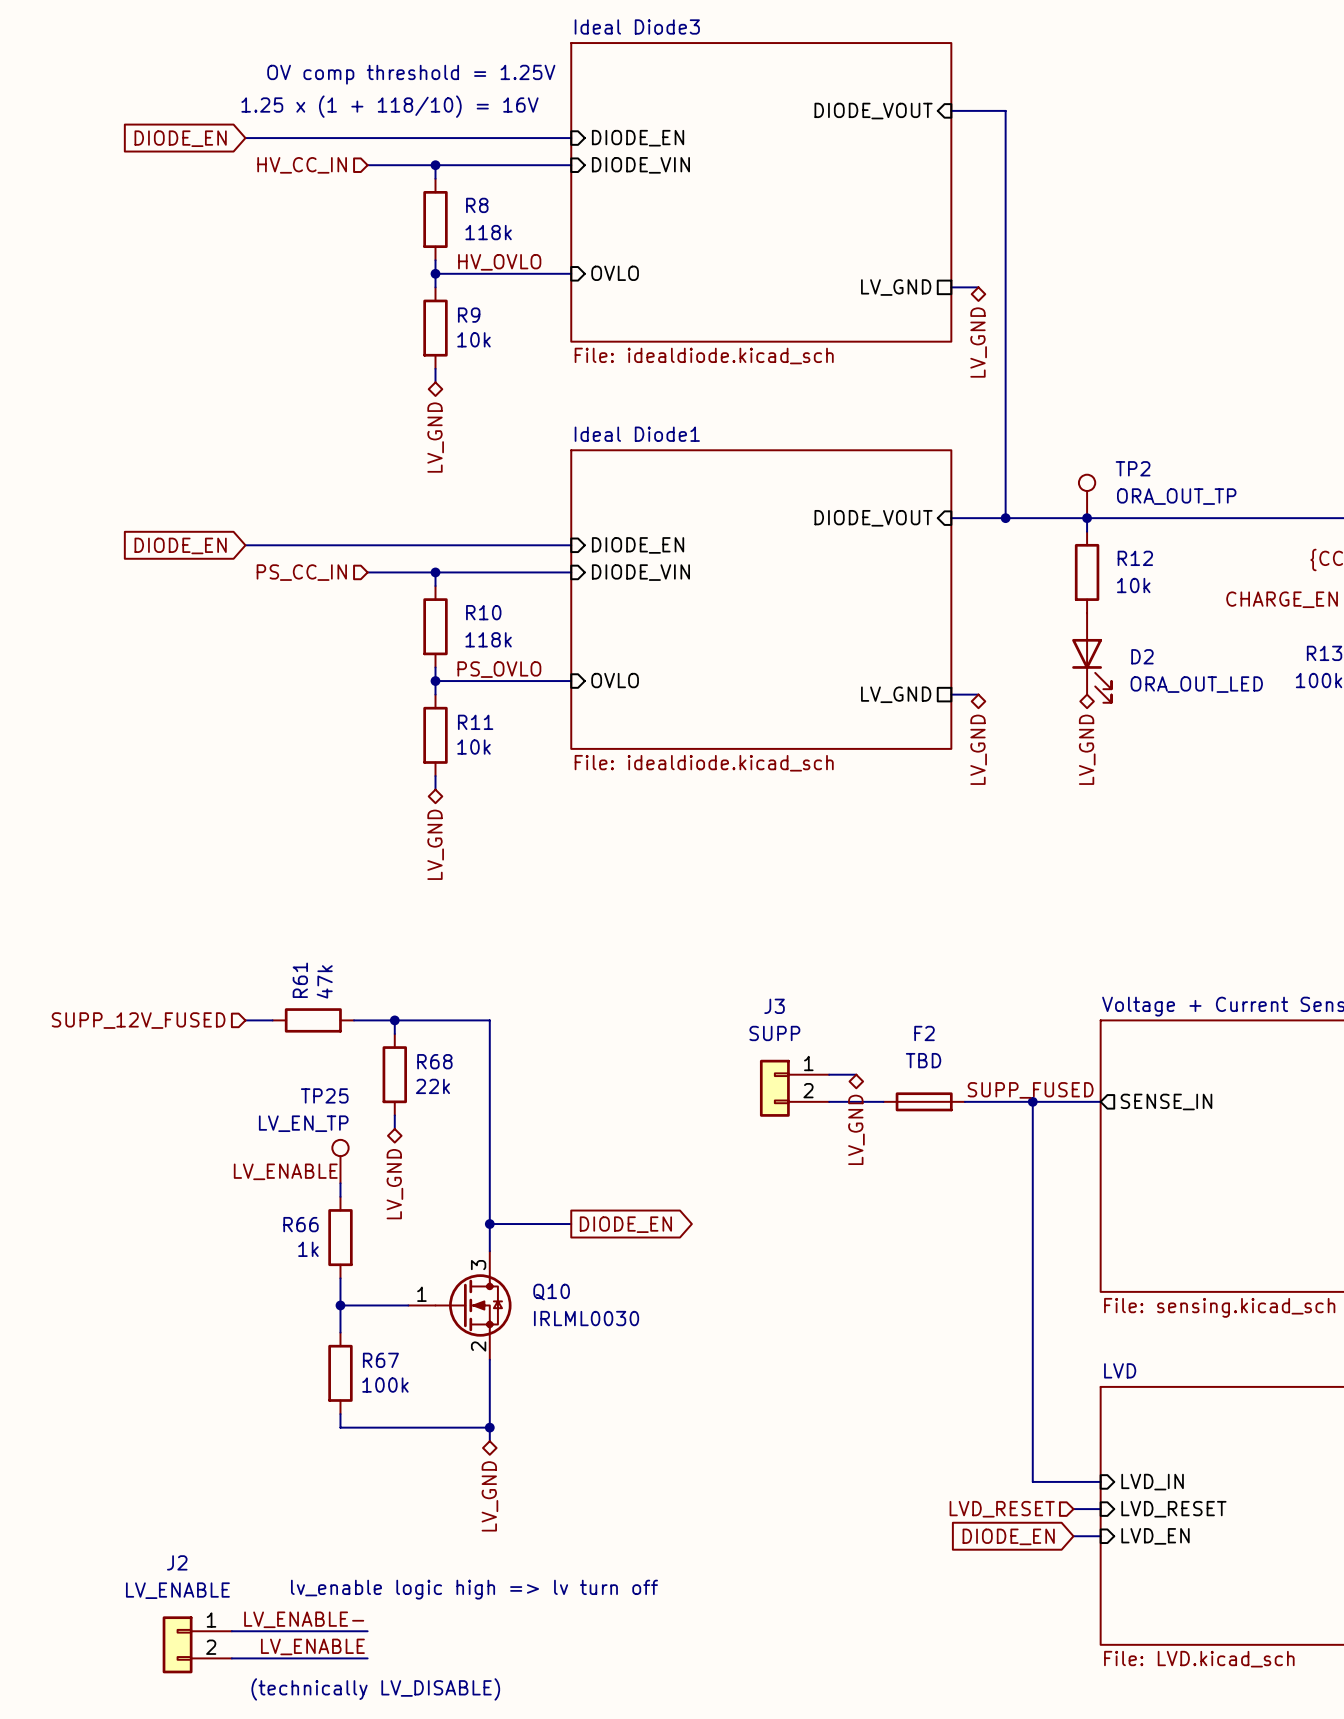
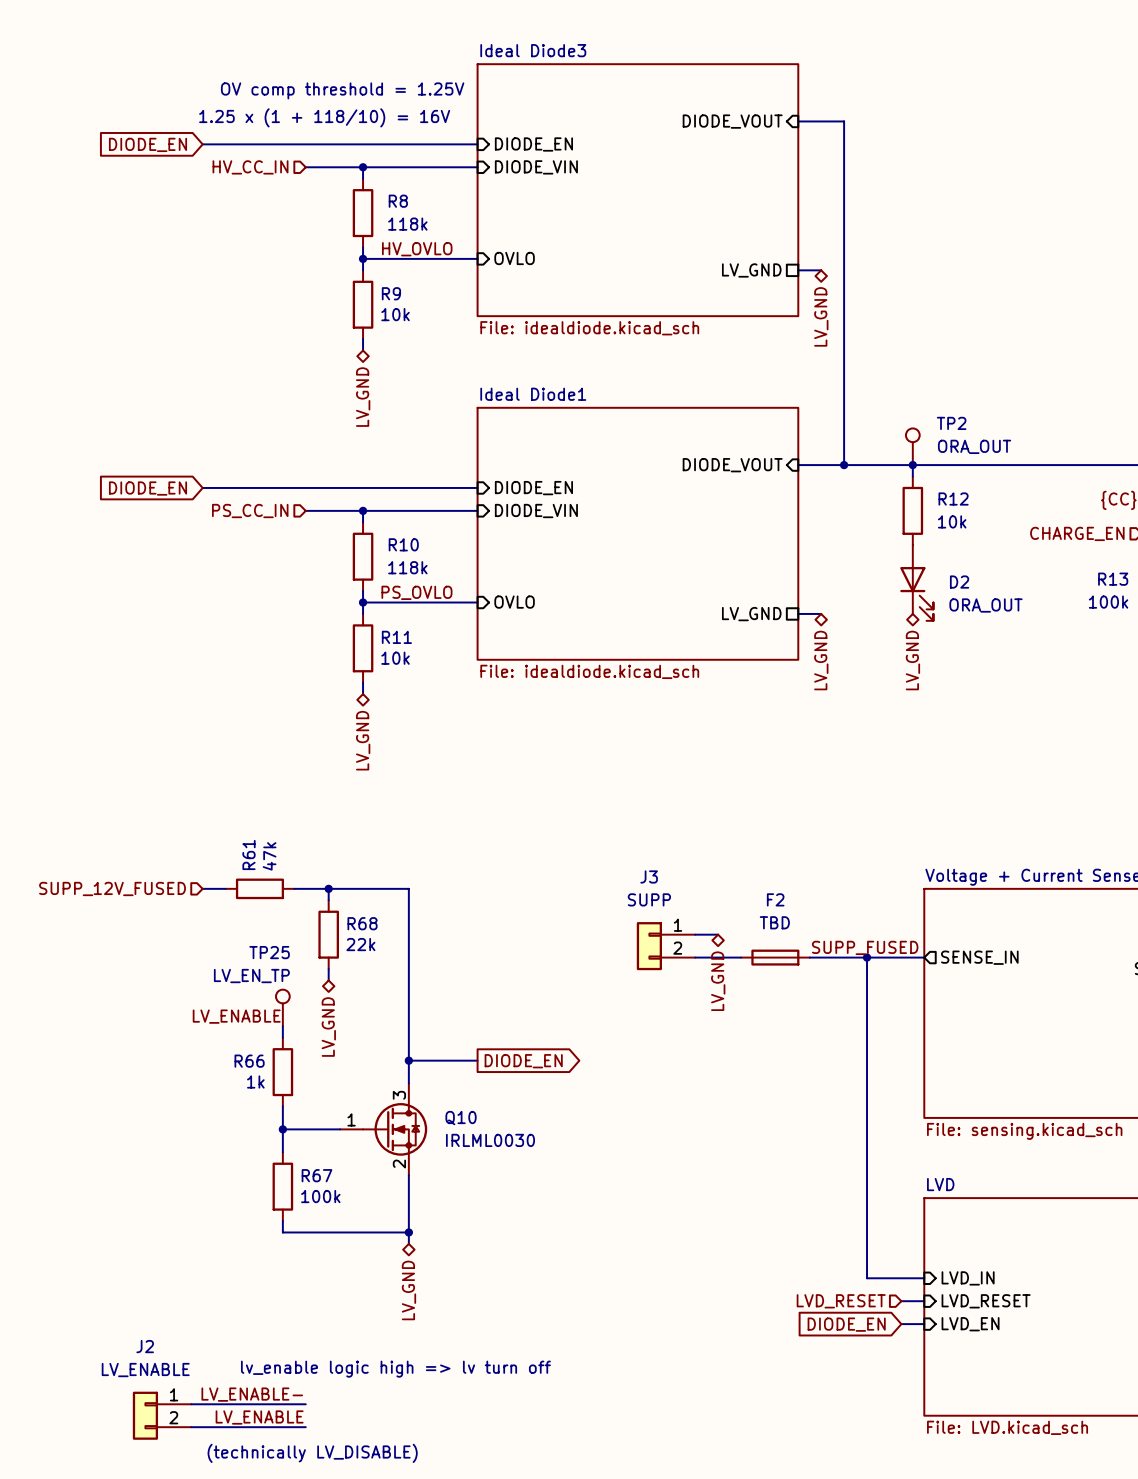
TP2 value: ORA_OUT_TP (1176, 496) -> ORA_OUT (974, 446)
D2 value: ORA_OUT_LED (1196, 684) -> ORA_OUT (986, 605)

